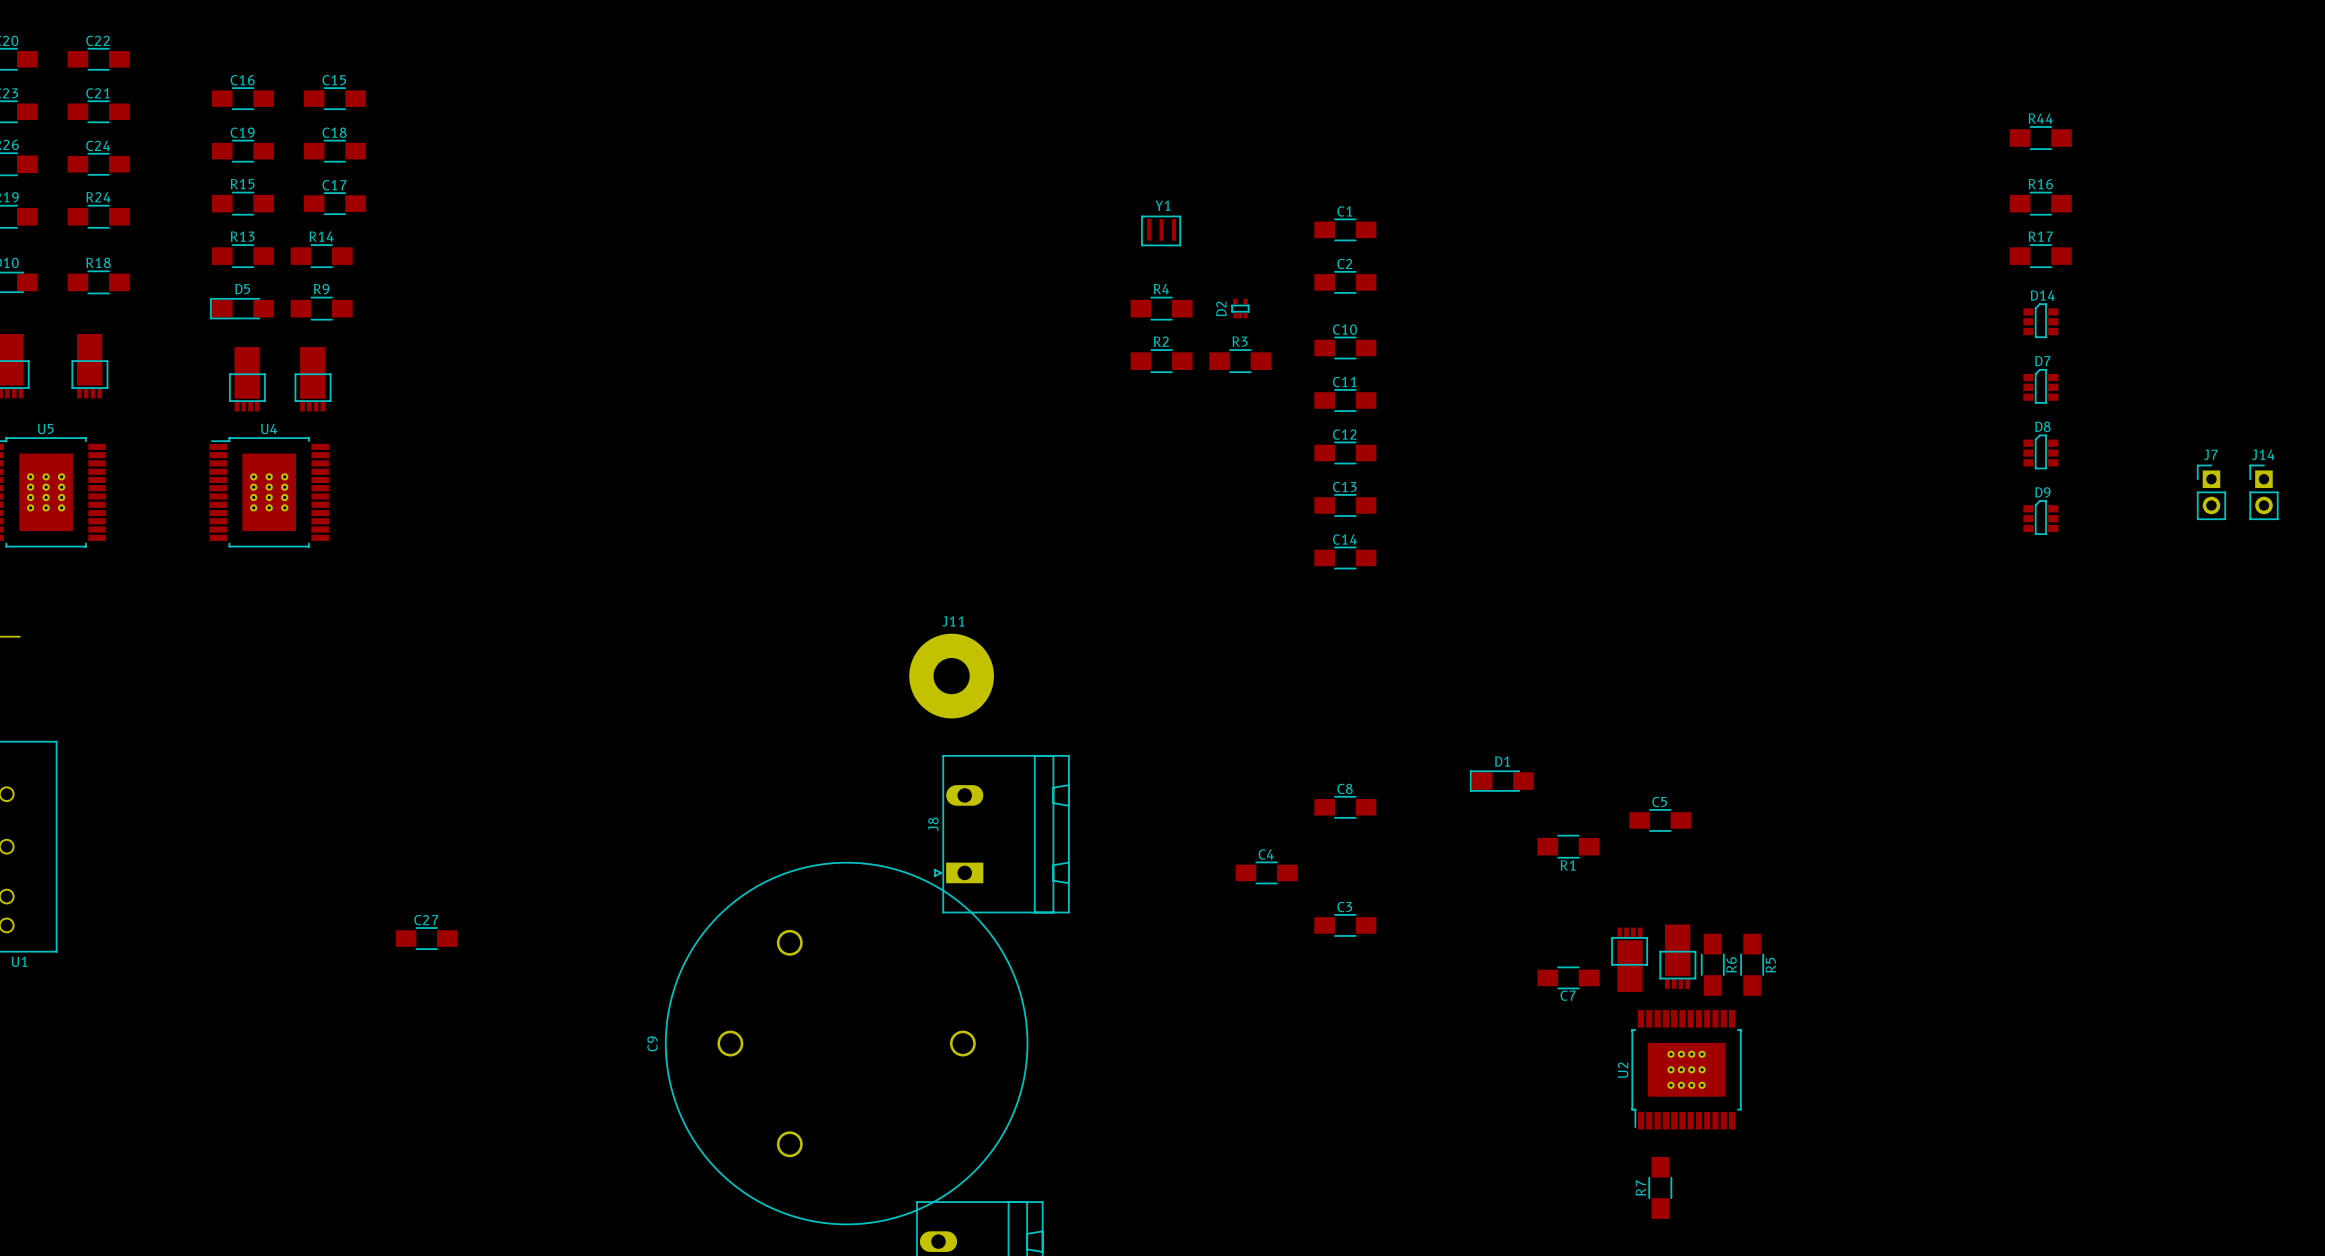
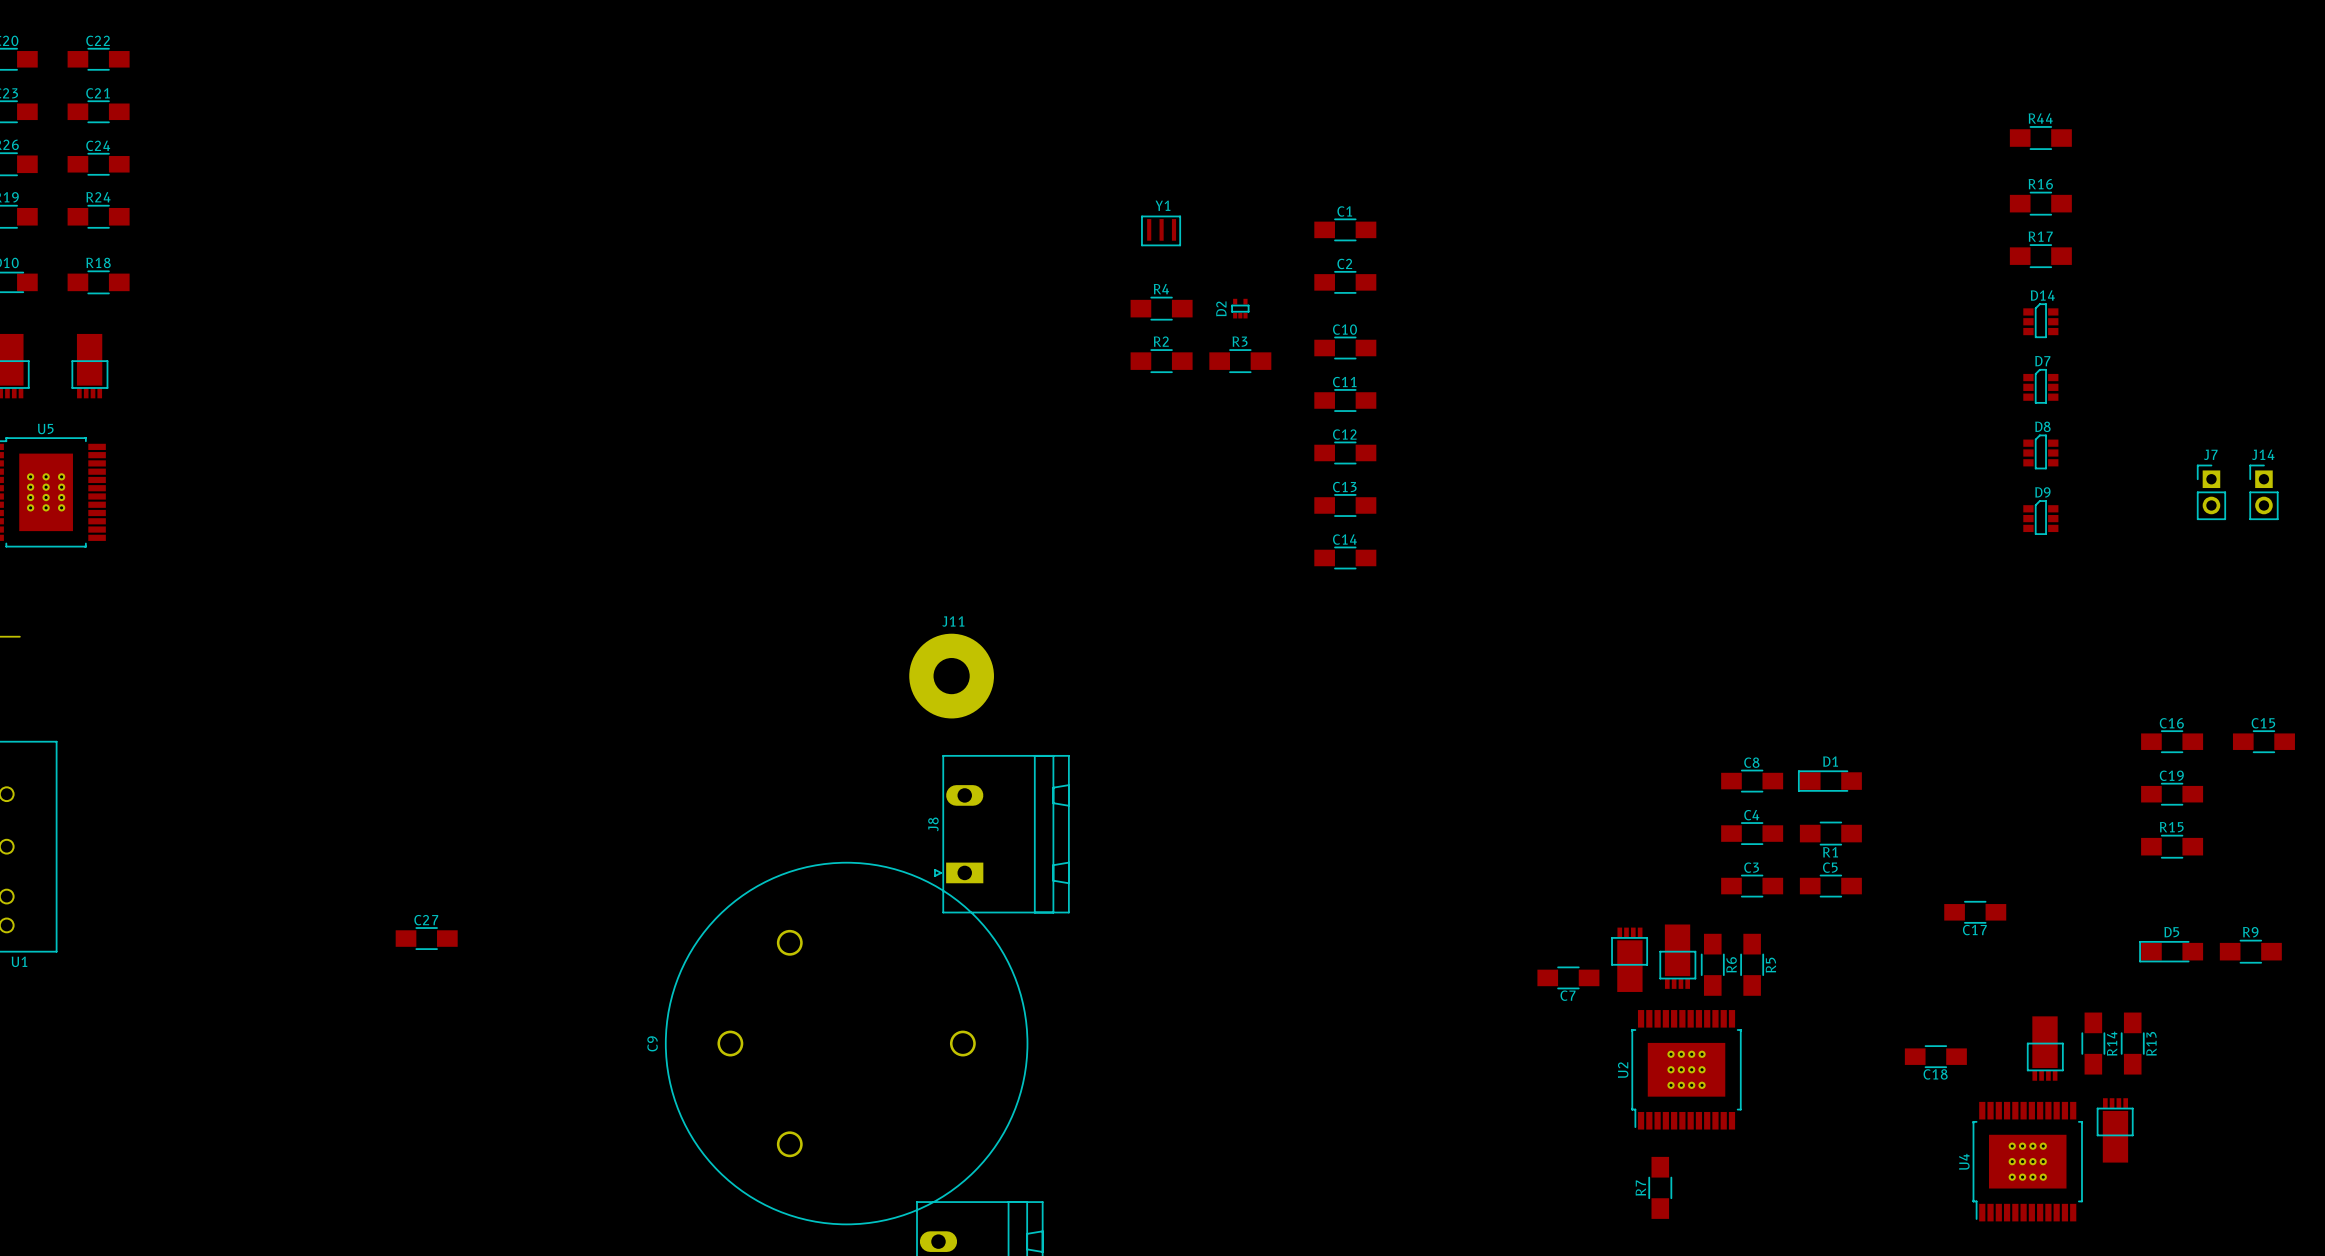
C16 position: (242, 98) -> (2172, 741)
C15 position: (334, 98) -> (2263, 741)
C18 name position: C18 (334, 132) -> C18 (1935, 1074)
C19 position: (242, 151) -> (2172, 794)
C18 position: (334, 151) -> (1935, 1056)
C17 name position: C17 (334, 185) -> C17 (1974, 930)
R15 position: (242, 203) -> (2172, 846)
C17 position: (334, 203) -> (1975, 912)
R13 rotation: 0° (242, 256) -> 90° clockwise (2132, 1043)
R13 position: (242, 256) -> (2132, 1043)
R14 rotation: 0° (321, 256) -> 90° clockwise (2093, 1043)
R14 position: (321, 256) -> (2093, 1043)
D5 position: (242, 308) -> (2171, 951)
R9 position: (321, 308) -> (2250, 951)
part: (247, 379) -> none
part: (313, 379) -> none
U4 rotation: 0° (269, 492) -> 90° counterclockwise (2027, 1161)
U4 position: (269, 492) -> (2027, 1161)
D1 position: (1501, 781) -> (1830, 781)
C8 position: (1345, 807) -> (1752, 781)
C5 position: (1660, 820) -> (1830, 886)
R1 position: (1568, 846) -> (1830, 833)
C4 position: (1266, 872) -> (1752, 833)
C3 position: (1345, 925) -> (1752, 886)
part: none -> (2045, 1048)
part: none -> (2115, 1130)

